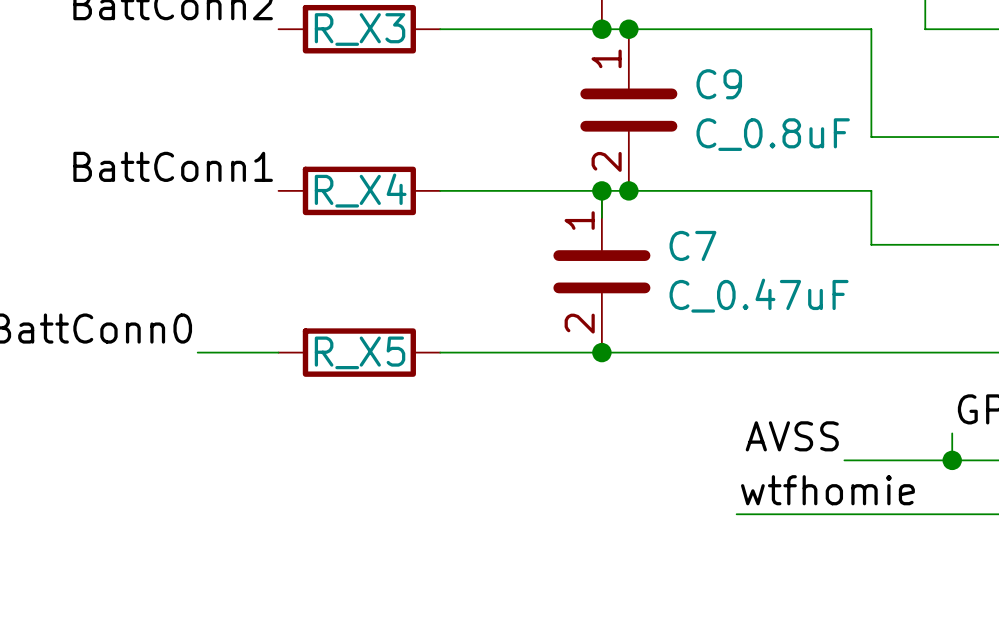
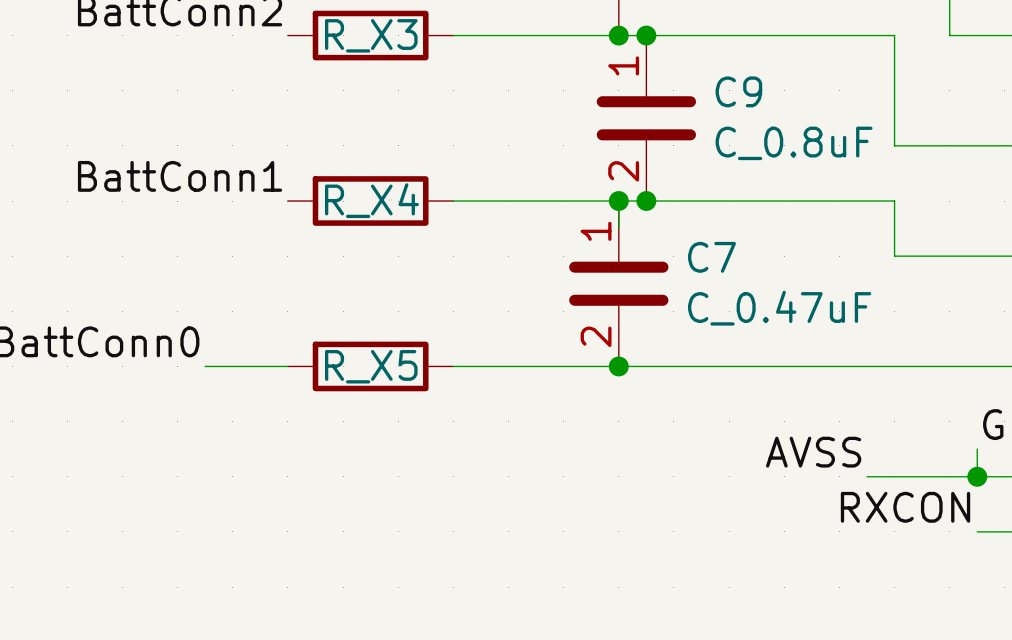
label: wtfhomie (827, 490) -> none
label: none -> RXCON (905, 507)
wire: (736, 514) (952, 514) -> none

